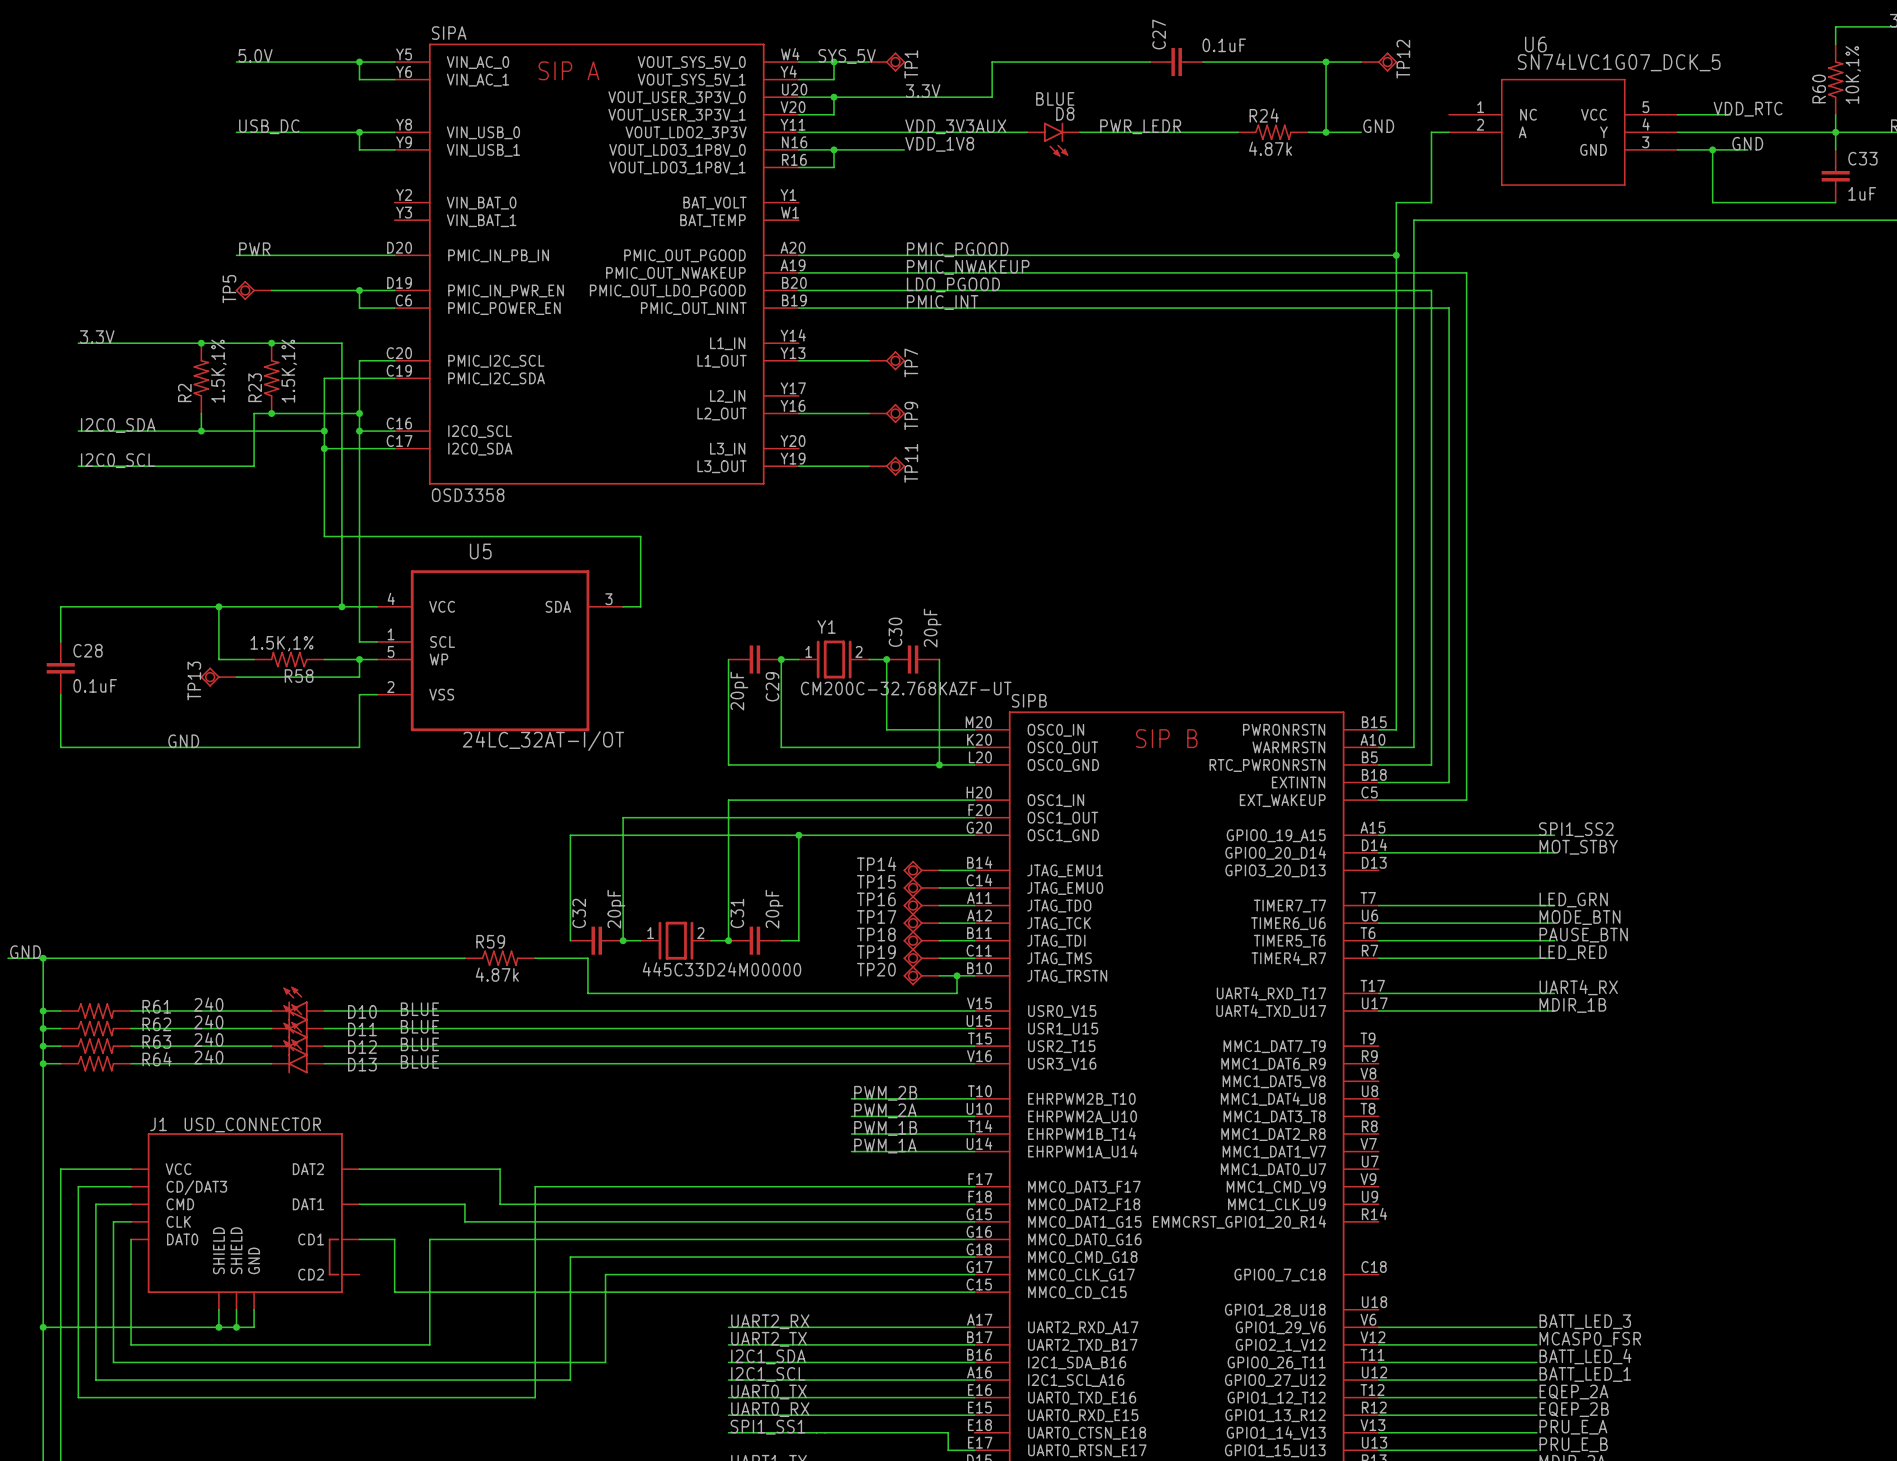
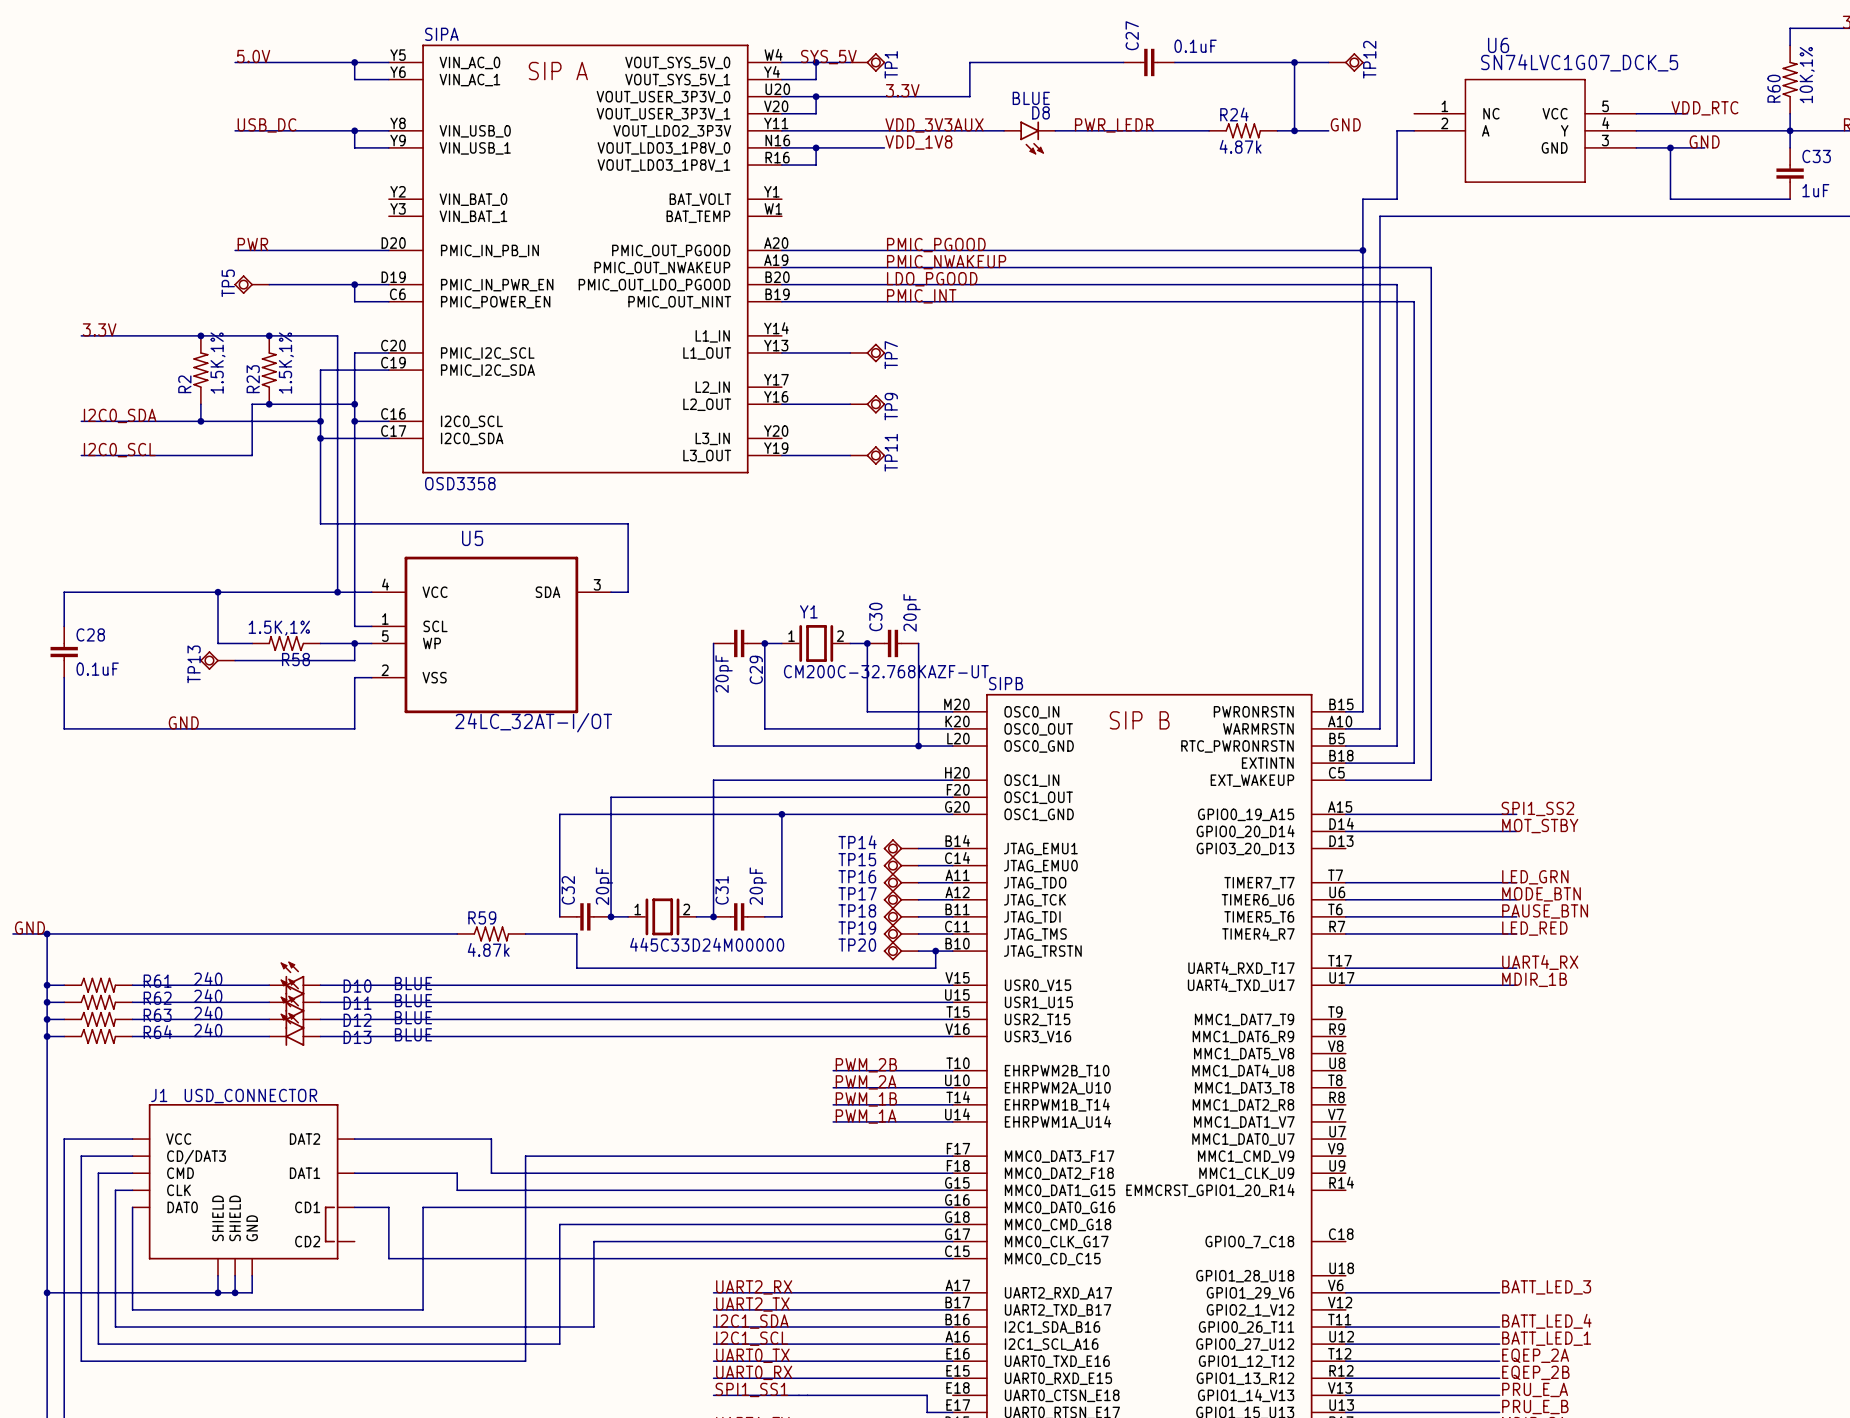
label: MCASP0_FSR (1590, 1339) -> none
wire: (1378, 1344) (1536, 1344) -> none

